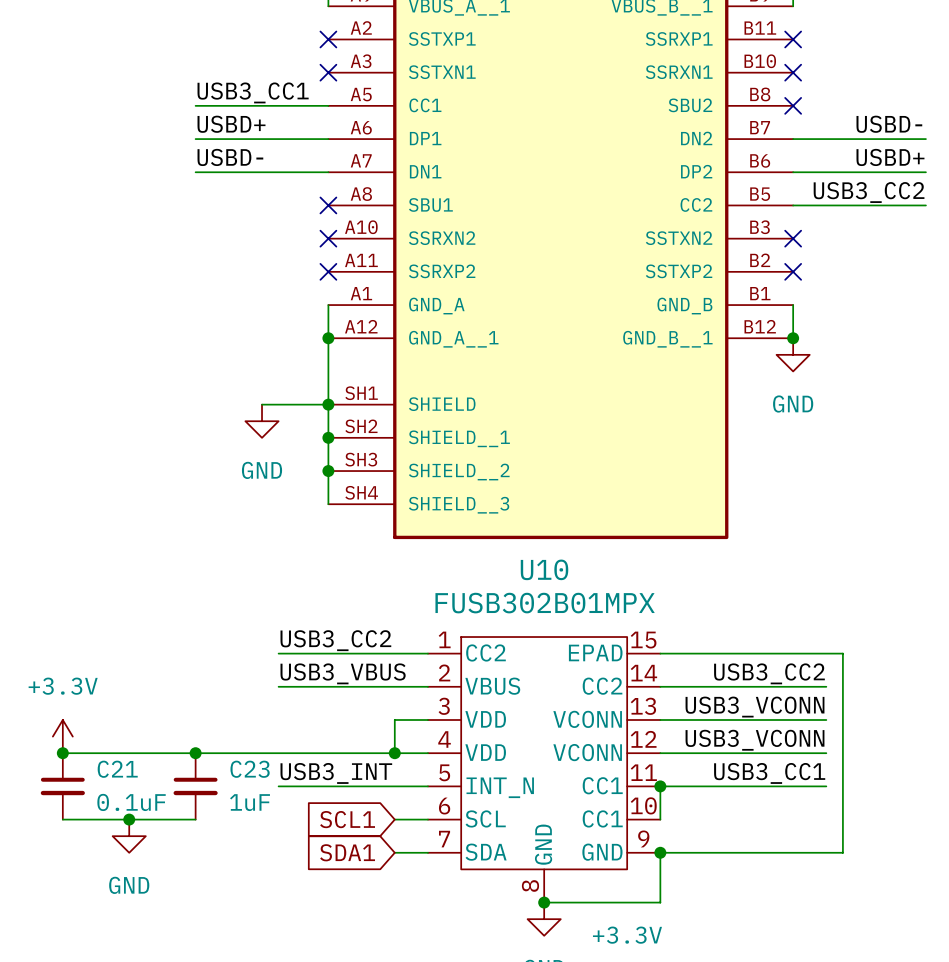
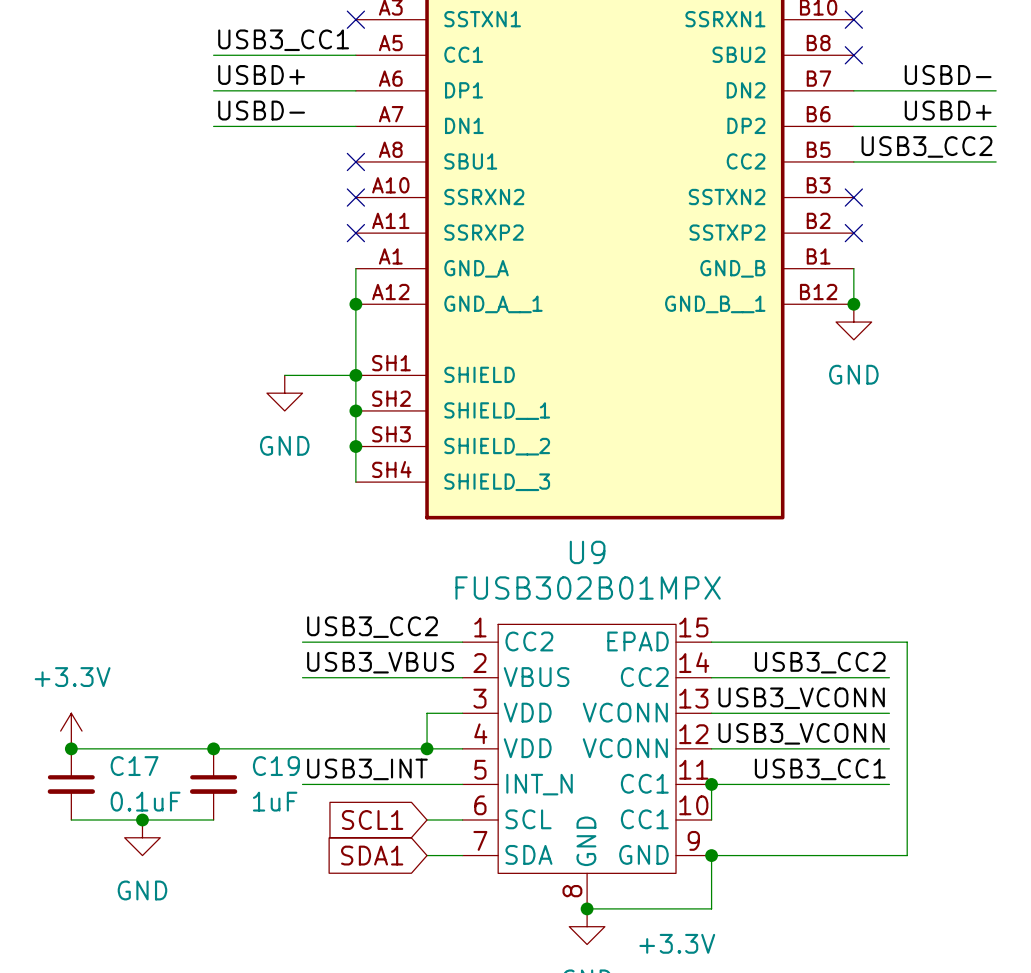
U10 name: U10 (544, 569) -> U9 (587, 552)
C21 name: C21 (117, 769) -> C17 (134, 766)
C23 name: C23 (250, 769) -> C19 (276, 766)

